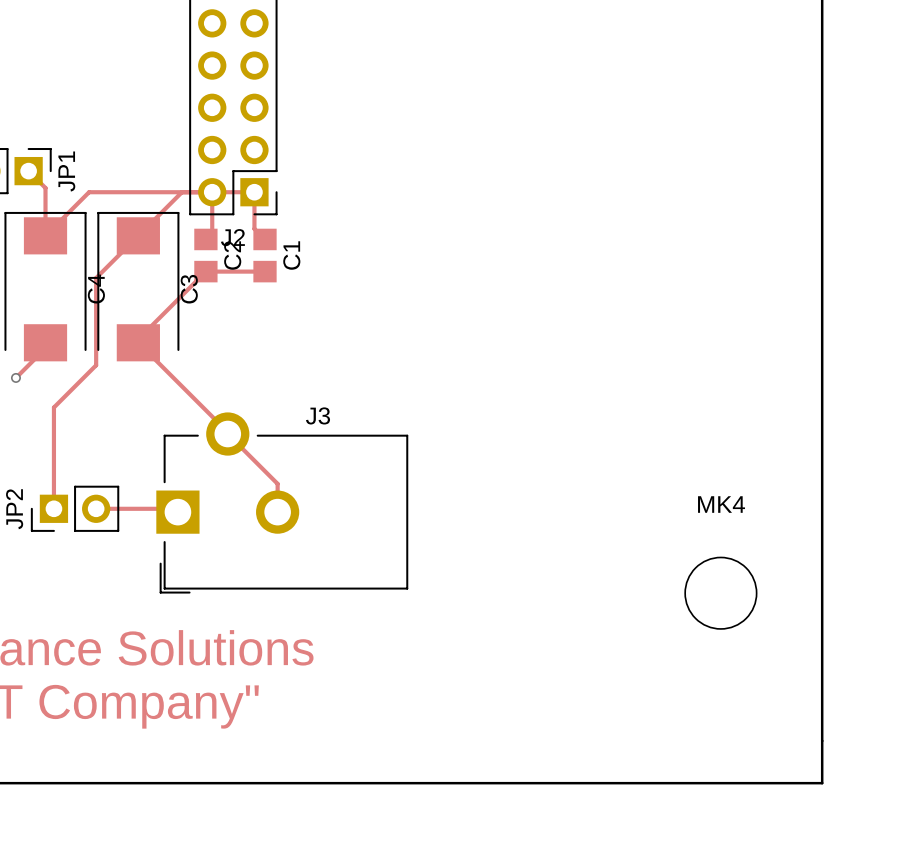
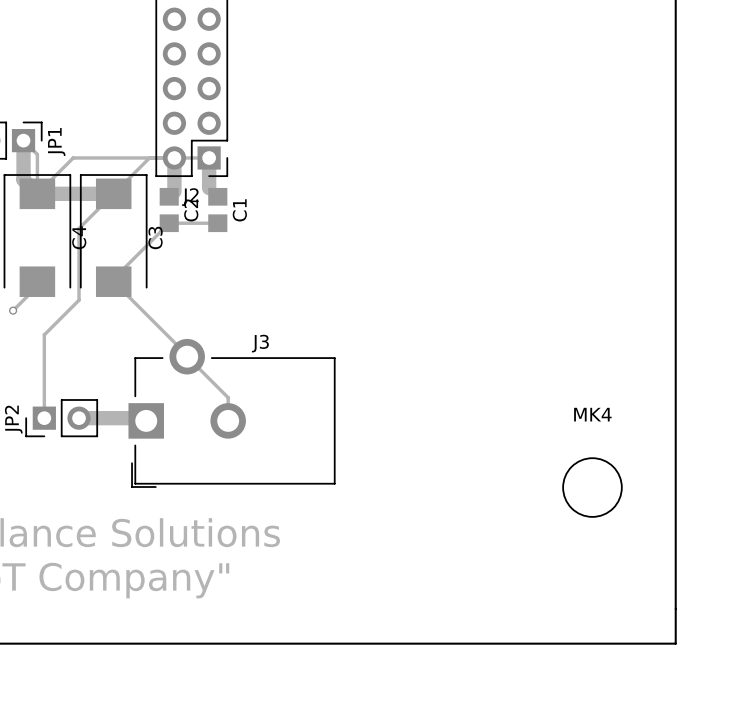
track: none -> (23, 140) (23, 179) (37, 193) (113, 193)
track width: thin (212, 192) (212, 233) -> thick (174, 157) (174, 191)
track width: thin (254, 192) (254, 228) -> thick (209, 157) (209, 188)
track width: thin (96, 508) (174, 508) -> thick (79, 418) (143, 418)

